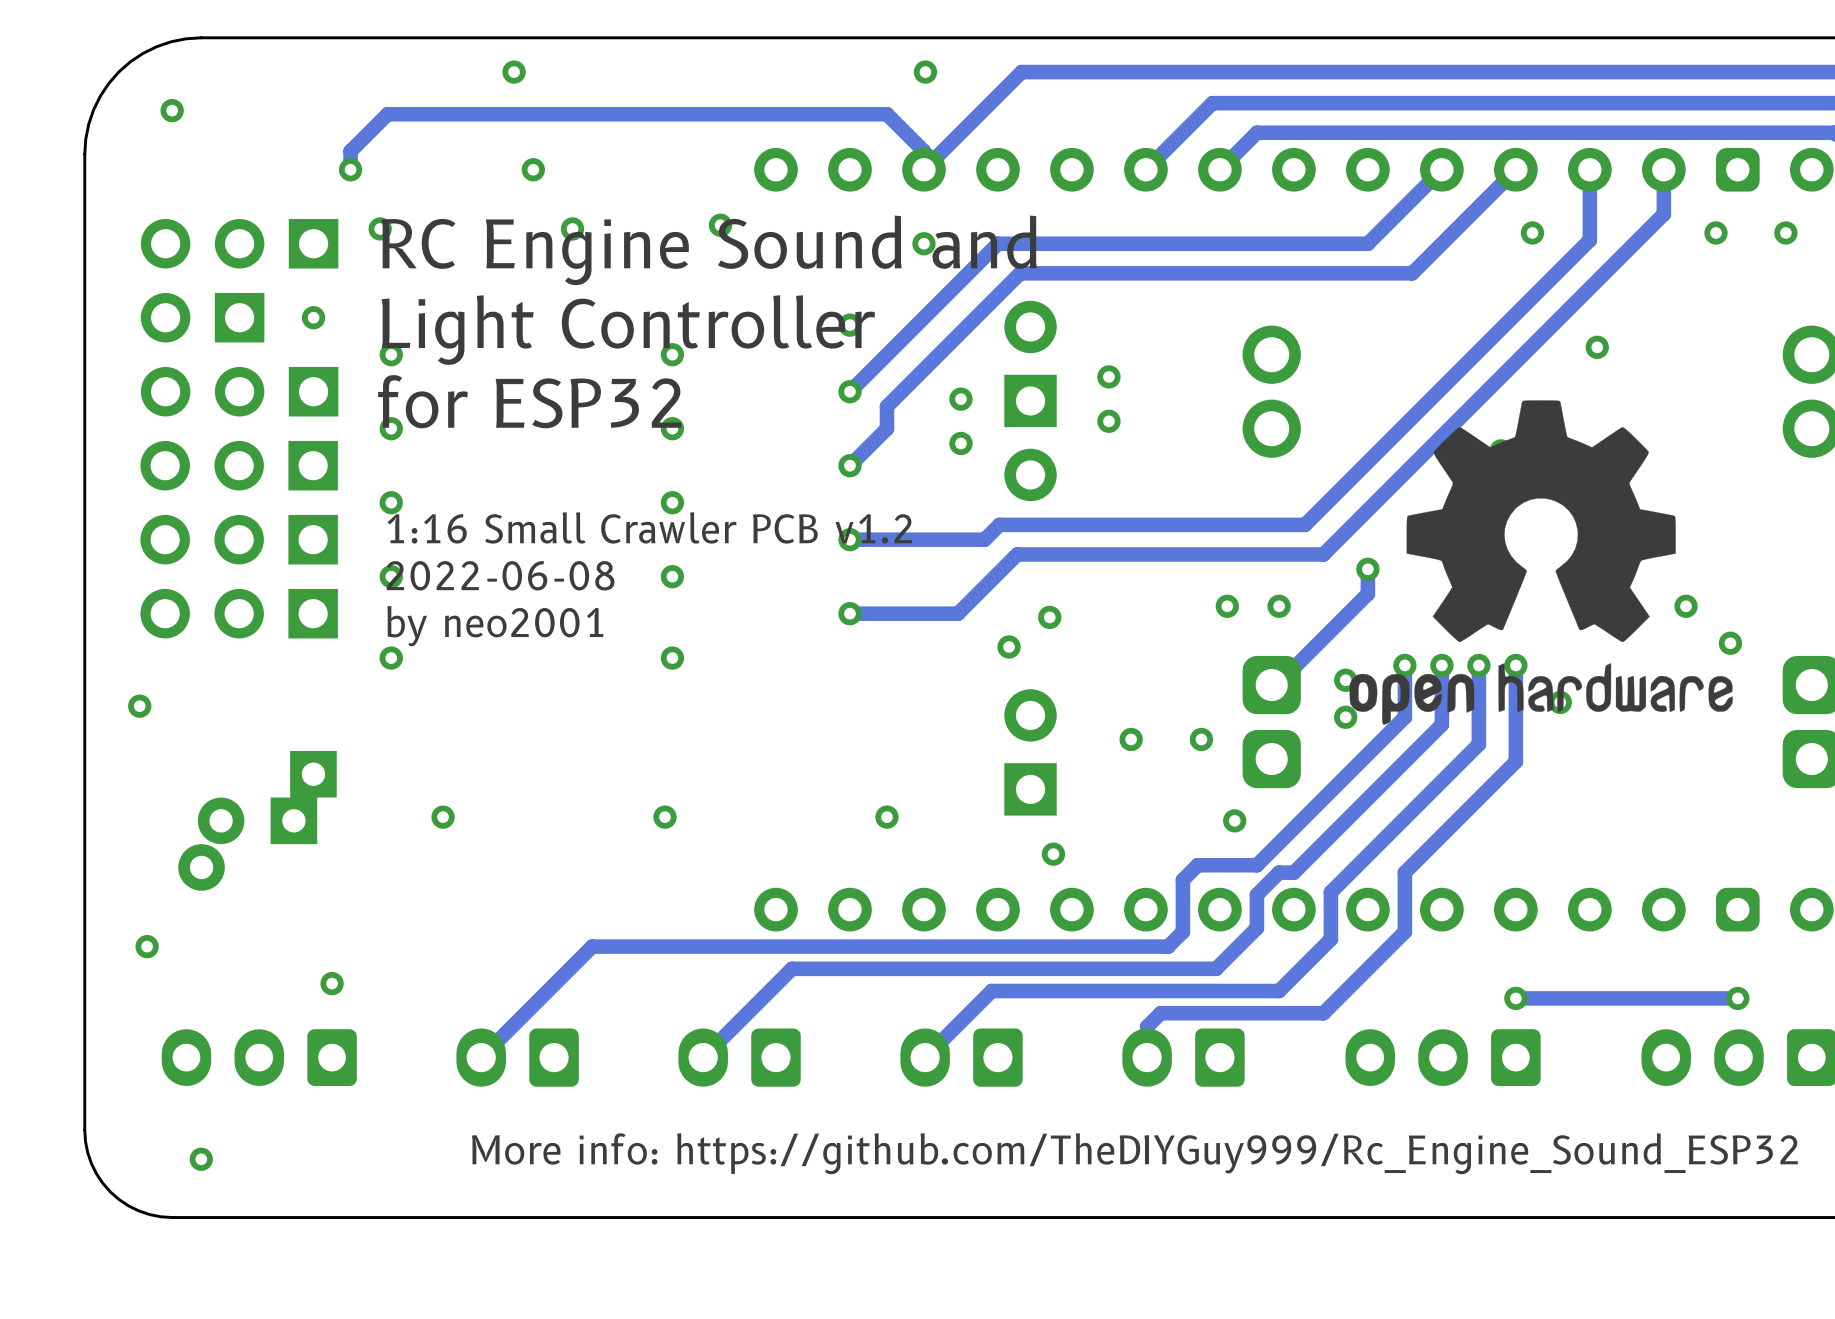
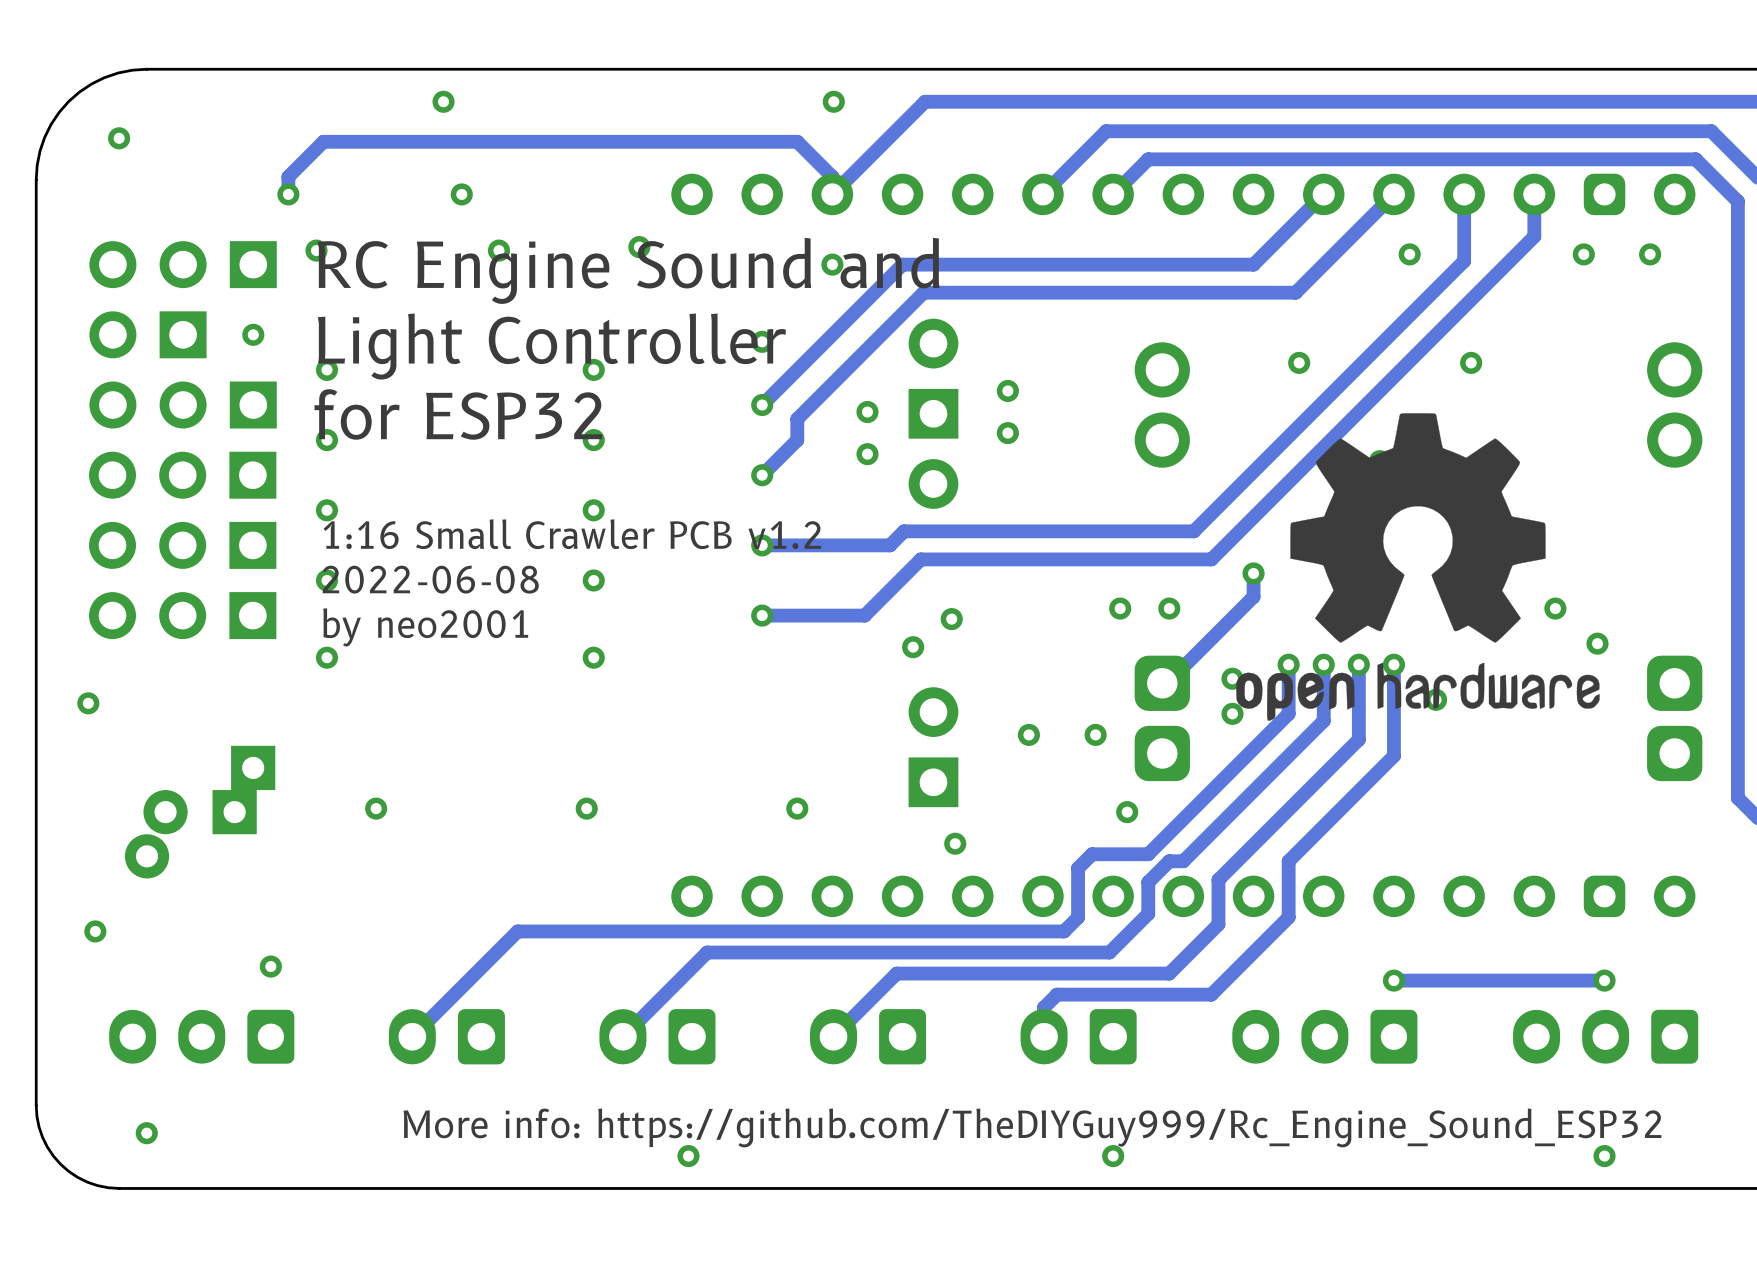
via: none -> (1299, 362)
via: none -> (688, 1156)
via: none -> (1113, 1156)
via: none -> (1604, 1156)

